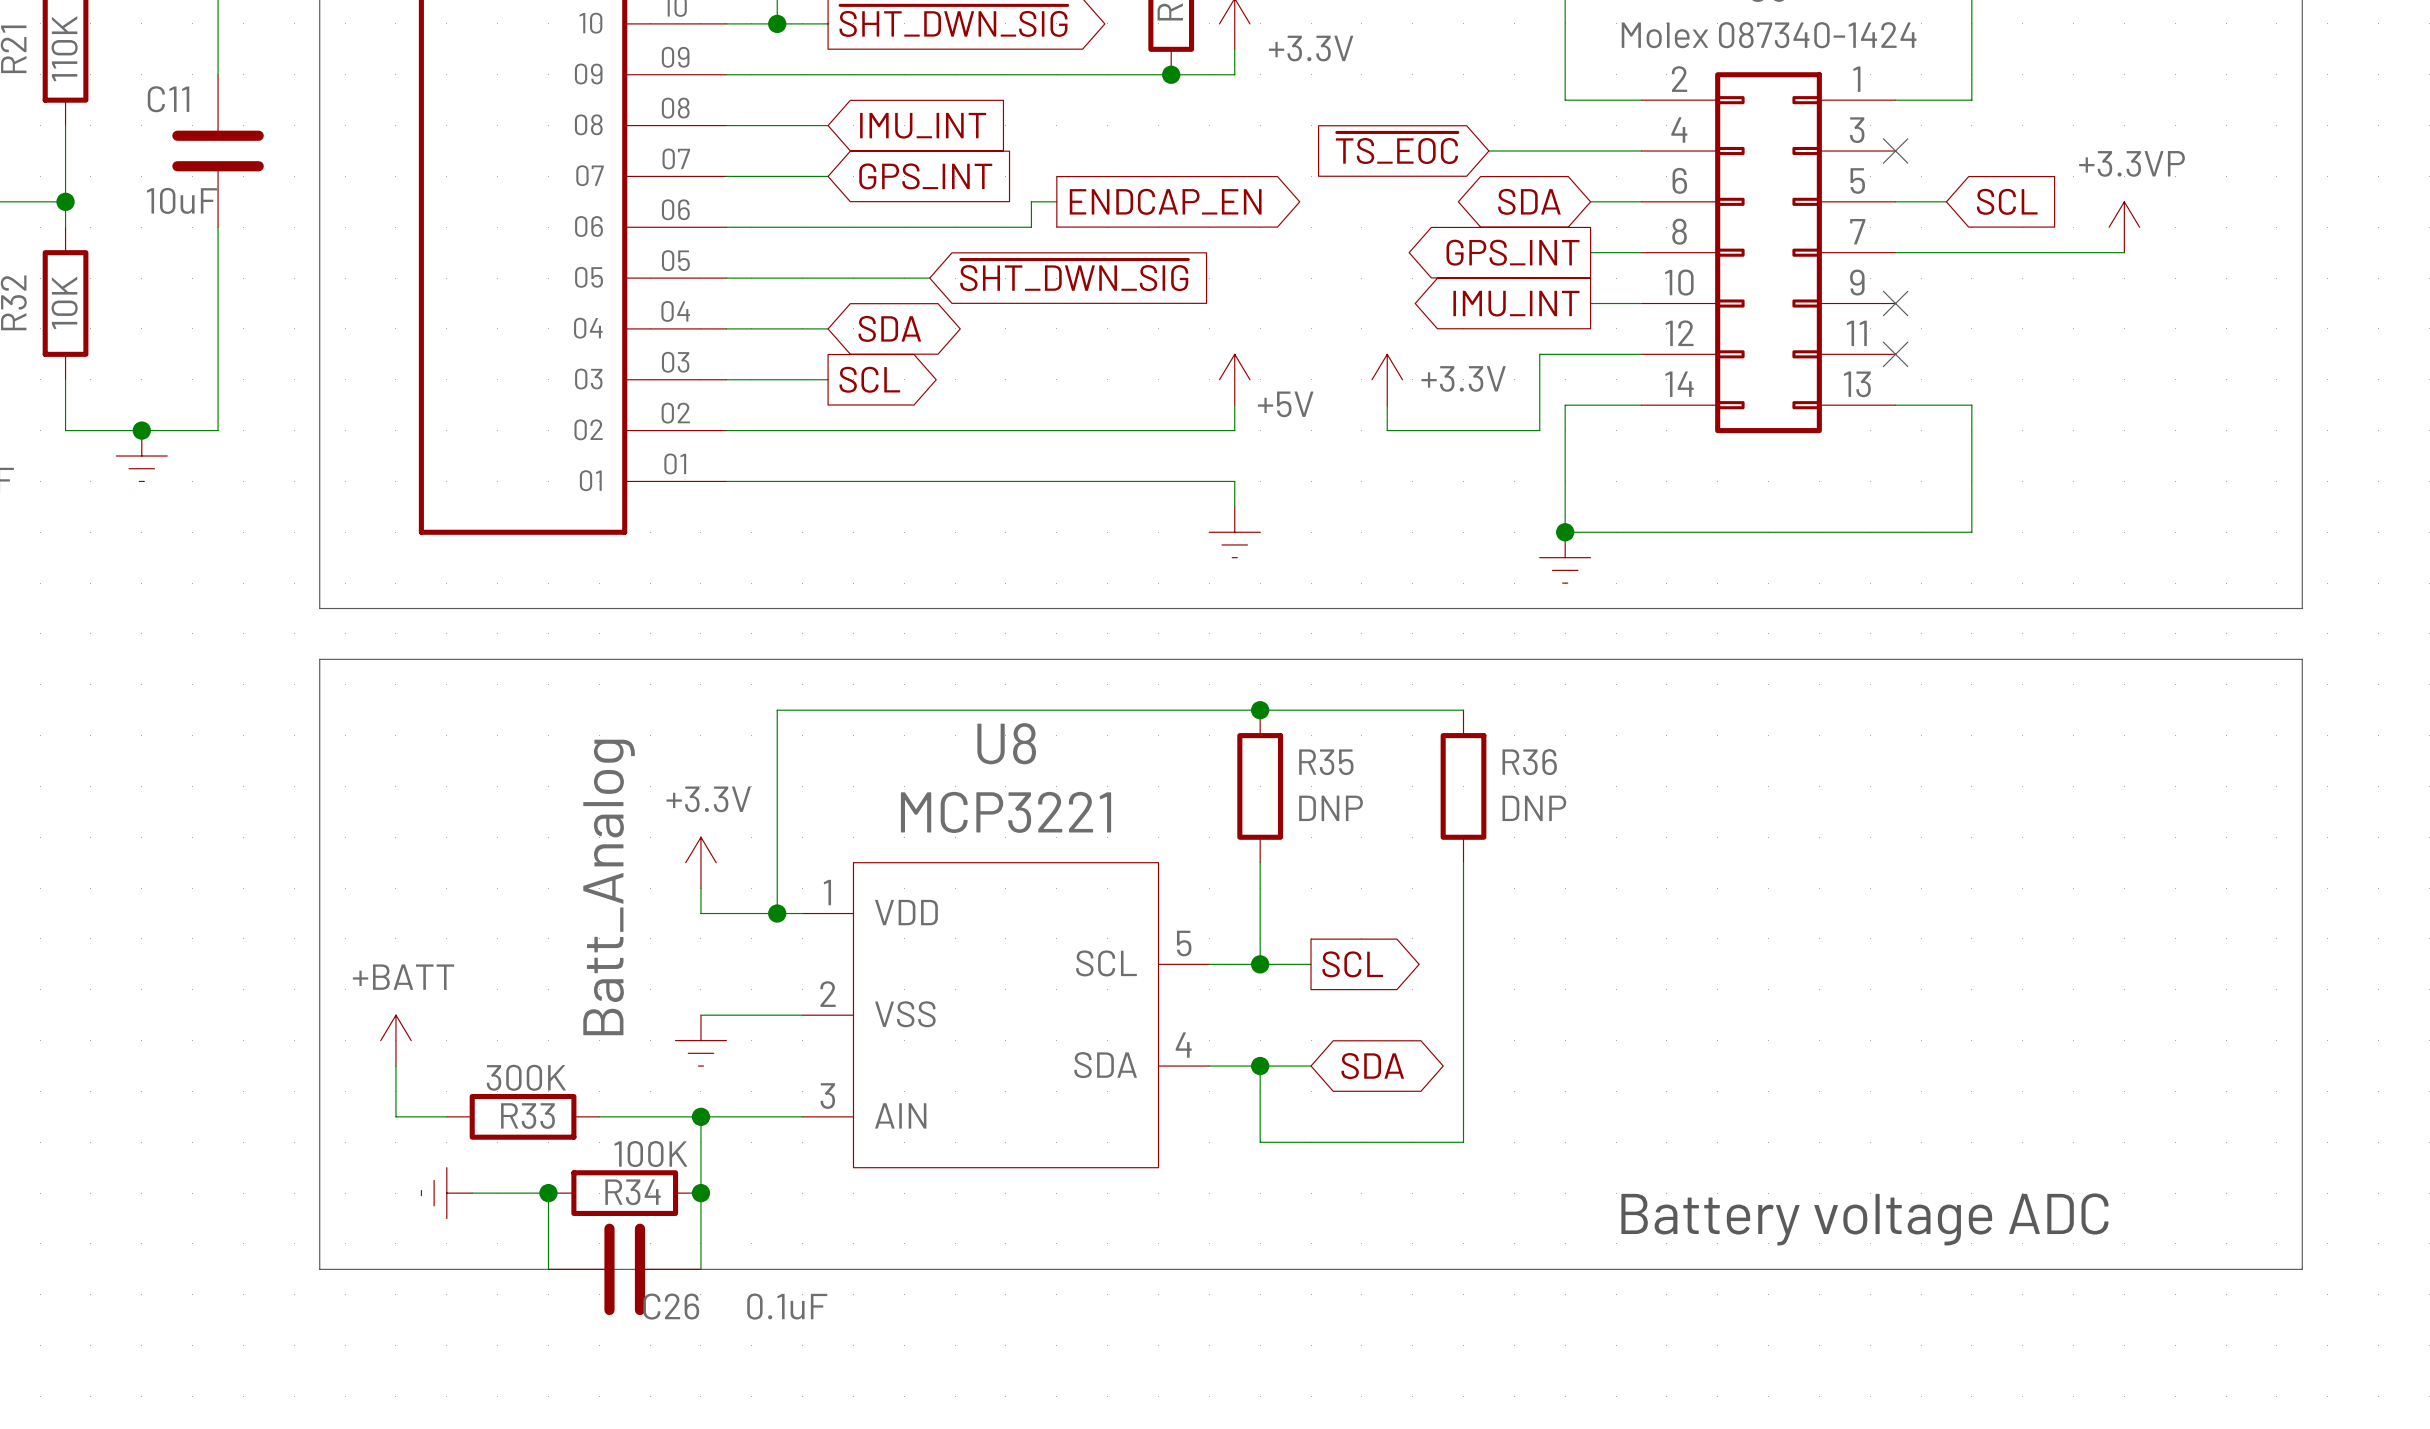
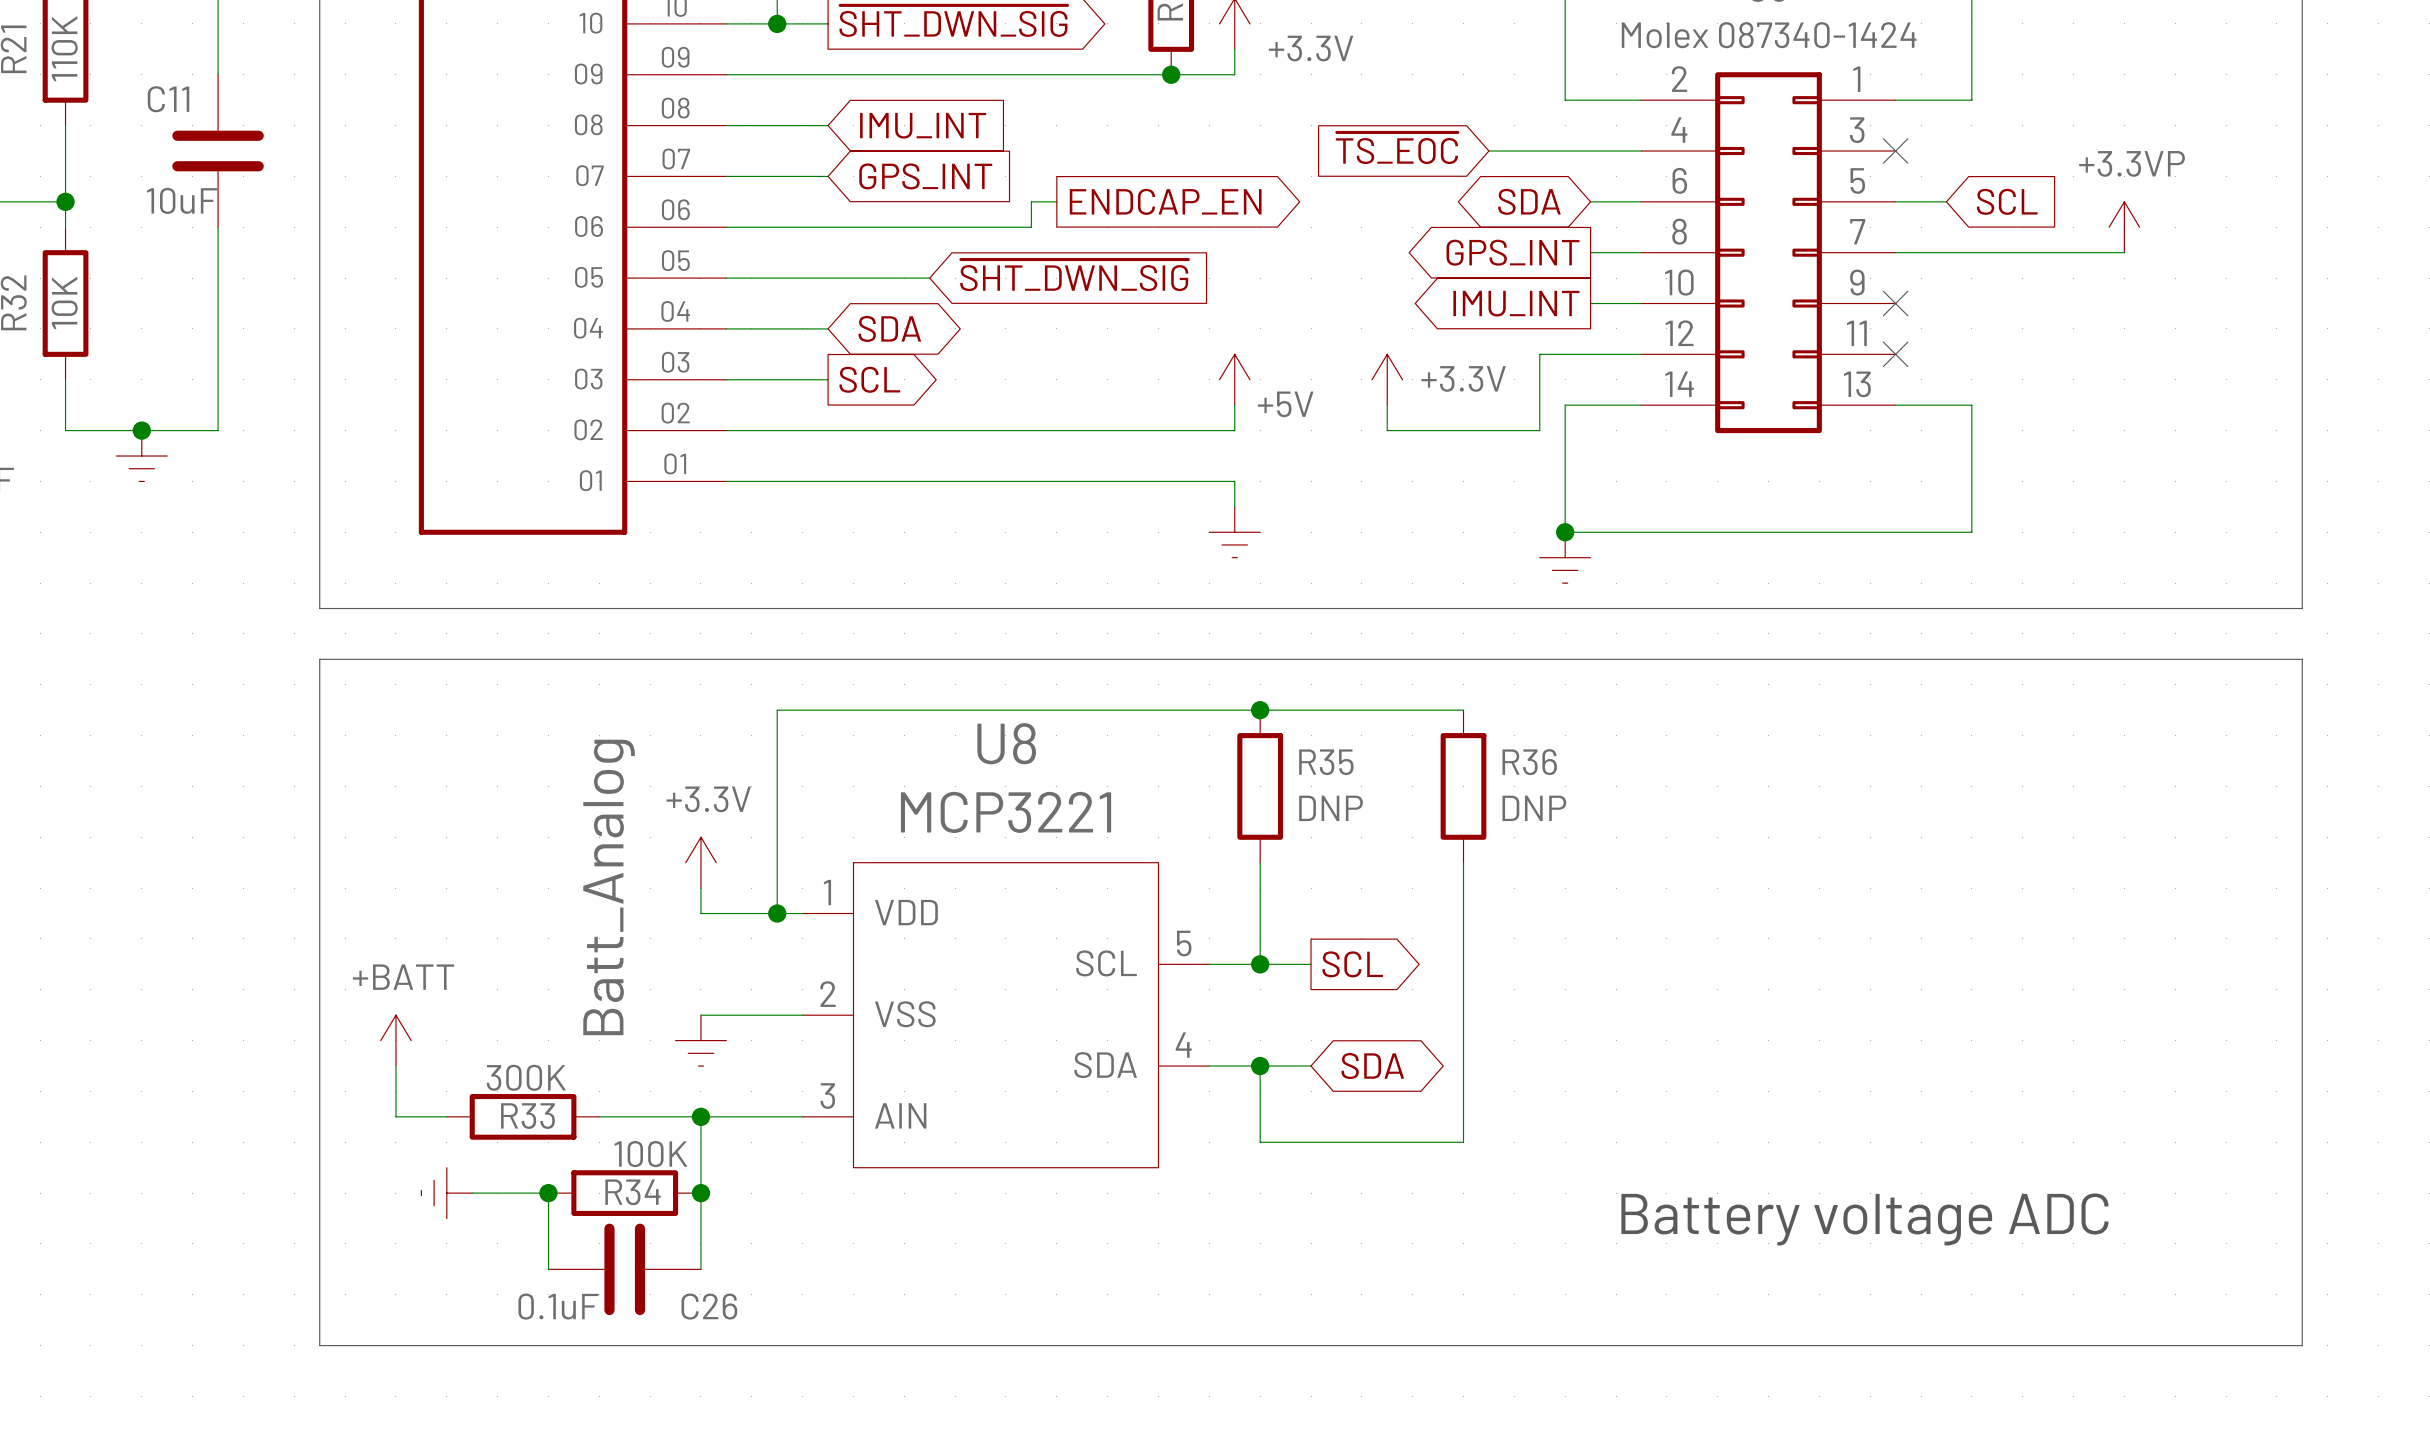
line: (319, 1269) (2302, 1269) -> (319, 1269) (319, 1345) (2302, 1345) (2302, 1269)
C26 name position: C26 (671, 1306) -> C26 (709, 1306)
C26 value position: 0.1uF (787, 1306) -> 0.1uF (558, 1306)

